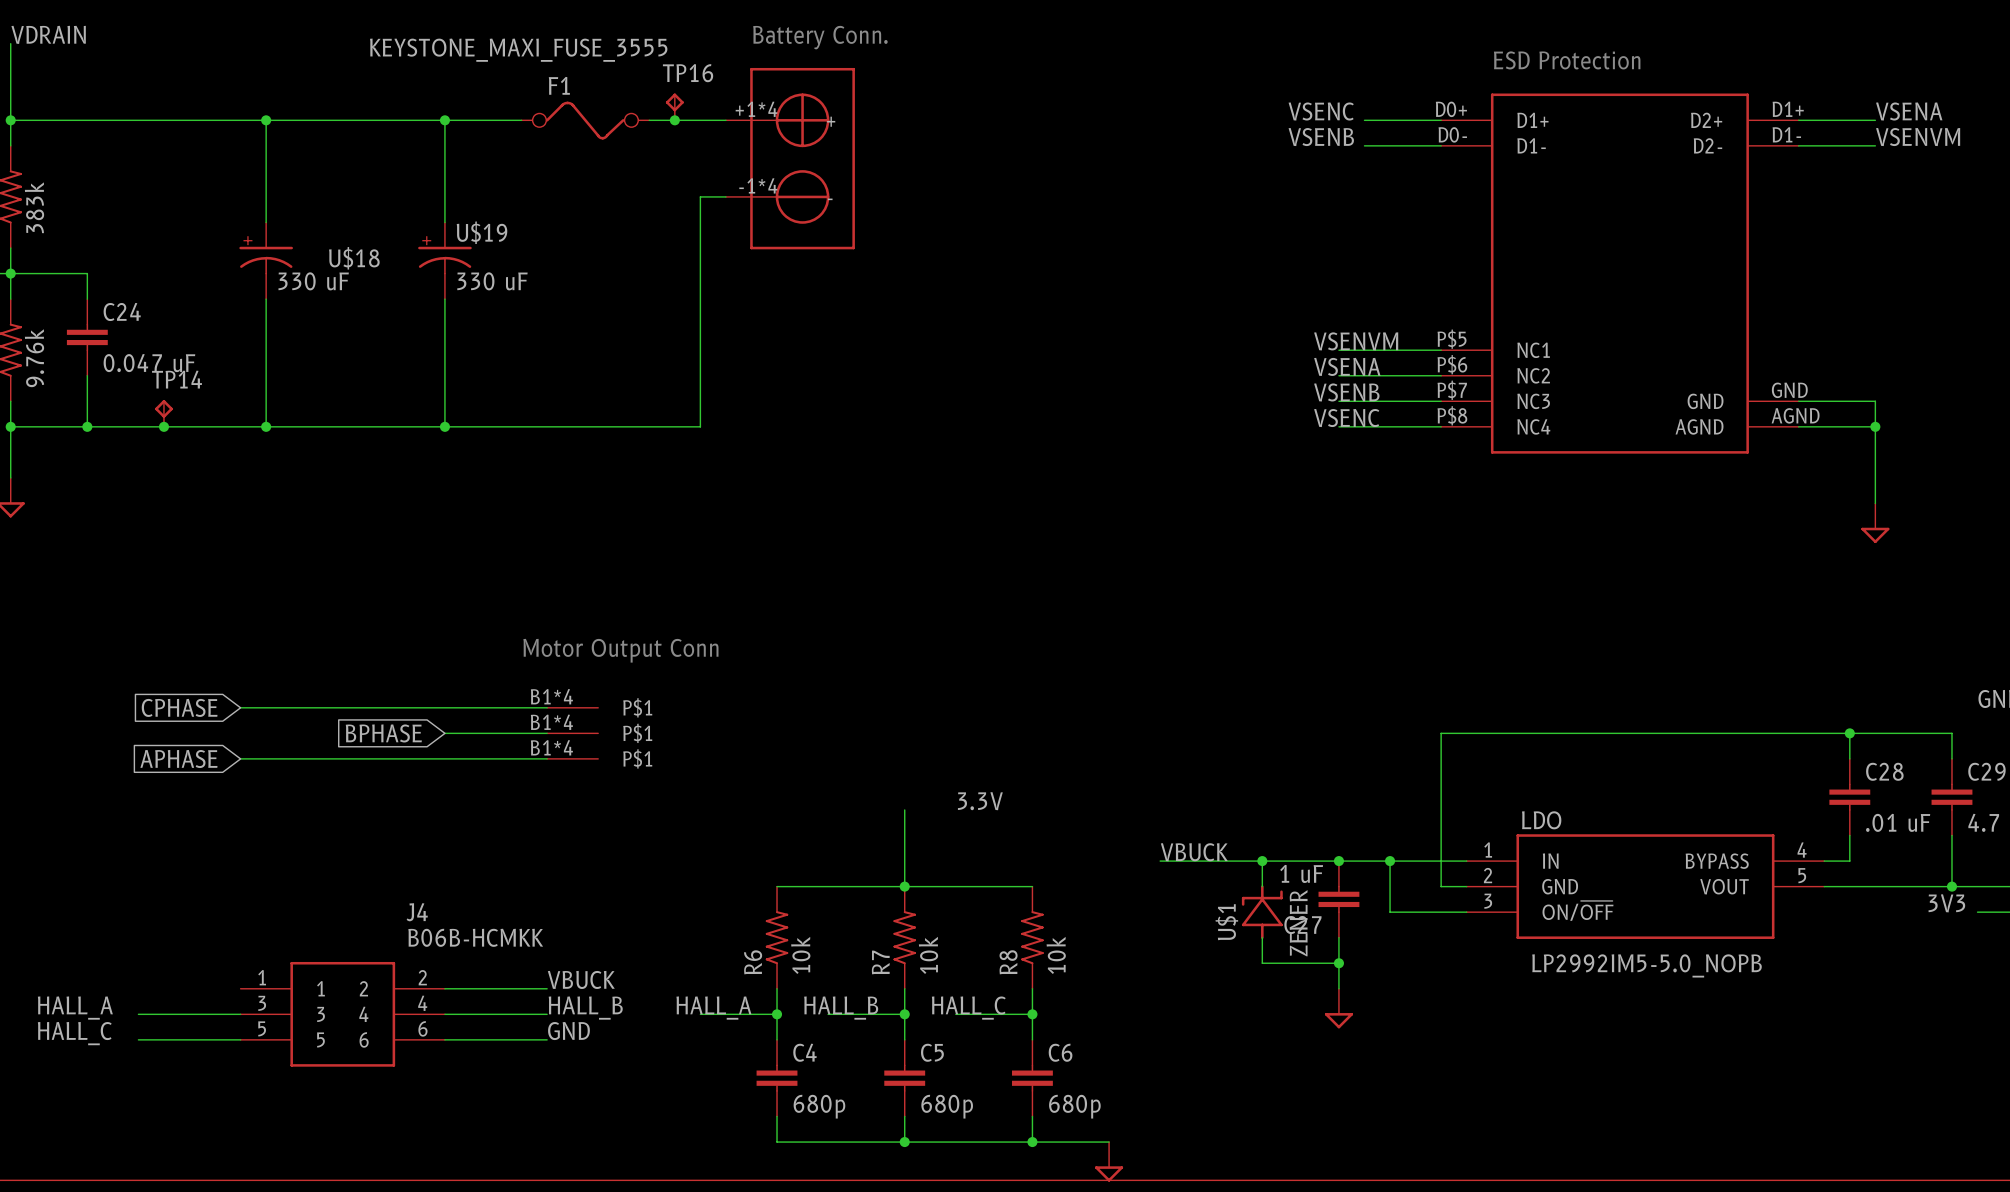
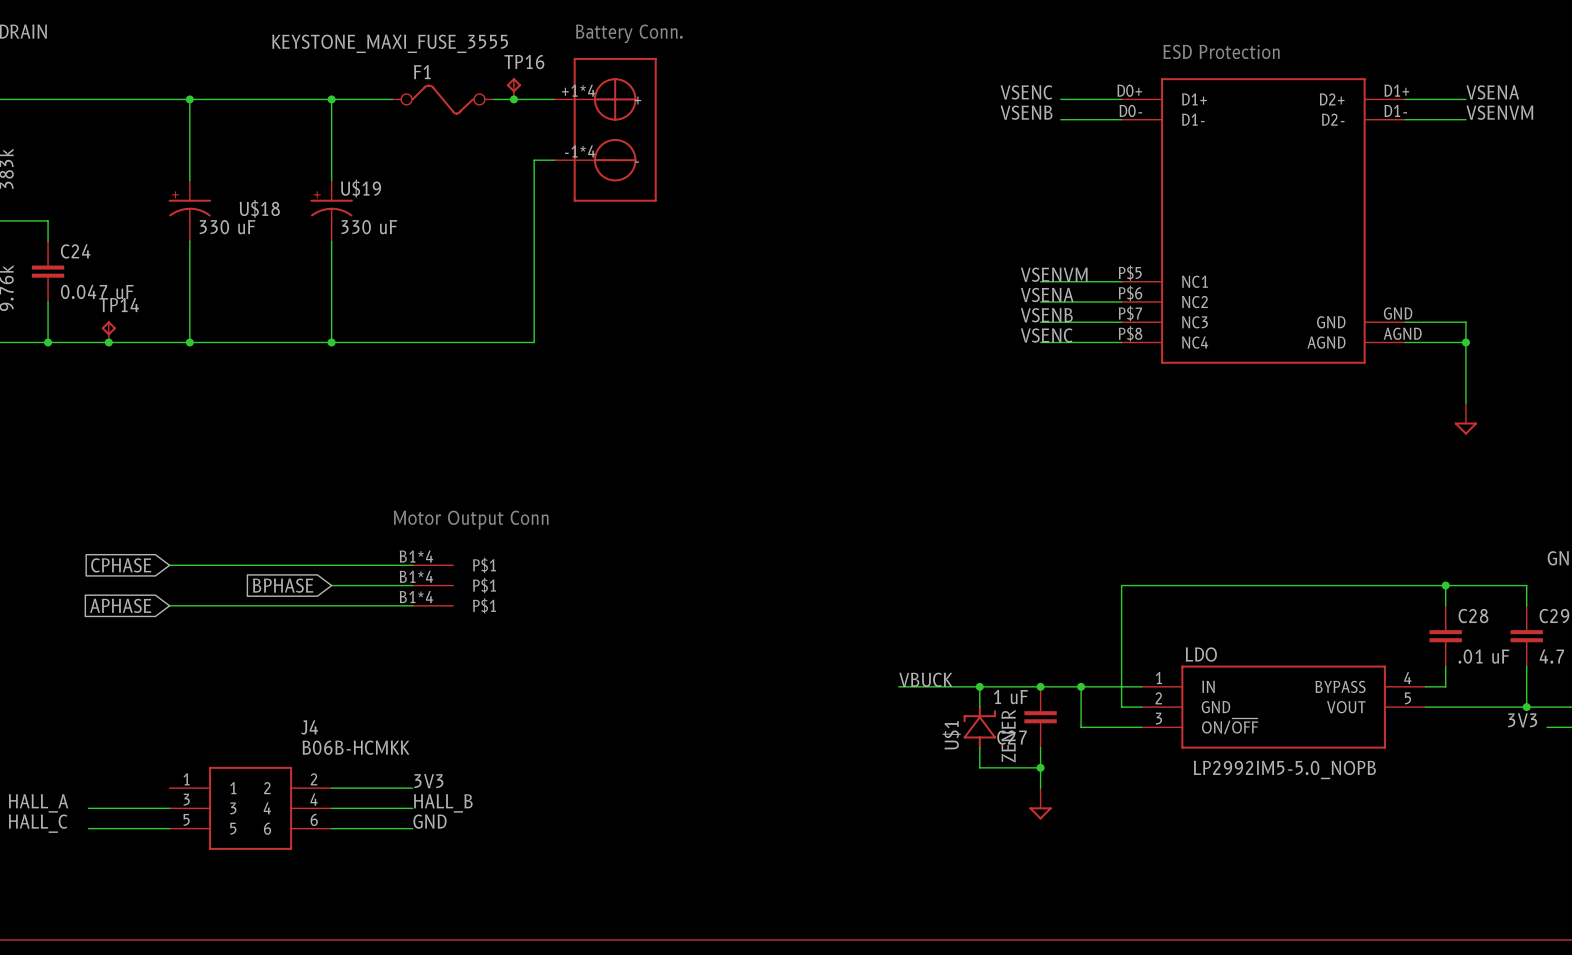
label: 3.3V (980, 801) -> none
wire: (904, 809) (904, 886) -> none
wire: (777, 886) (1032, 886) -> none
junction: (904, 886) -> none
R6: 10k (777, 937) -> none
R7: 10k (904, 937) -> none
R8: 10k (1032, 937) -> none
label: VBUCK (581, 979) -> 3V3 (428, 781)
wire: (777, 988) (777, 1039) -> none
wire: (904, 988) (904, 1039) -> none
wire: (1032, 988) (1032, 1039) -> none
label: HALL_A (713, 1008) -> none
label: HALL_B (841, 1008) -> none
label: HALL_C (968, 1008) -> none
wire: (700, 1014) (777, 1014) -> none
junction: (777, 1014) -> none
wire: (828, 1014) (904, 1014) -> none
junction: (904, 1014) -> none
wire: (955, 1014) (1032, 1014) -> none
junction: (1032, 1014) -> none
C4: 680p (777, 1078) -> none
C5: 680p (904, 1078) -> none
C6: 680p (1032, 1078) -> none
wire: (777, 1116) (777, 1142) (1109, 1142) -> none
wire: (904, 1116) (904, 1142) -> none
wire: (1032, 1116) (1032, 1142) -> none
junction: (904, 1142) -> none
junction: (1032, 1142) -> none
power symbol: (1109, 1161) -> none

